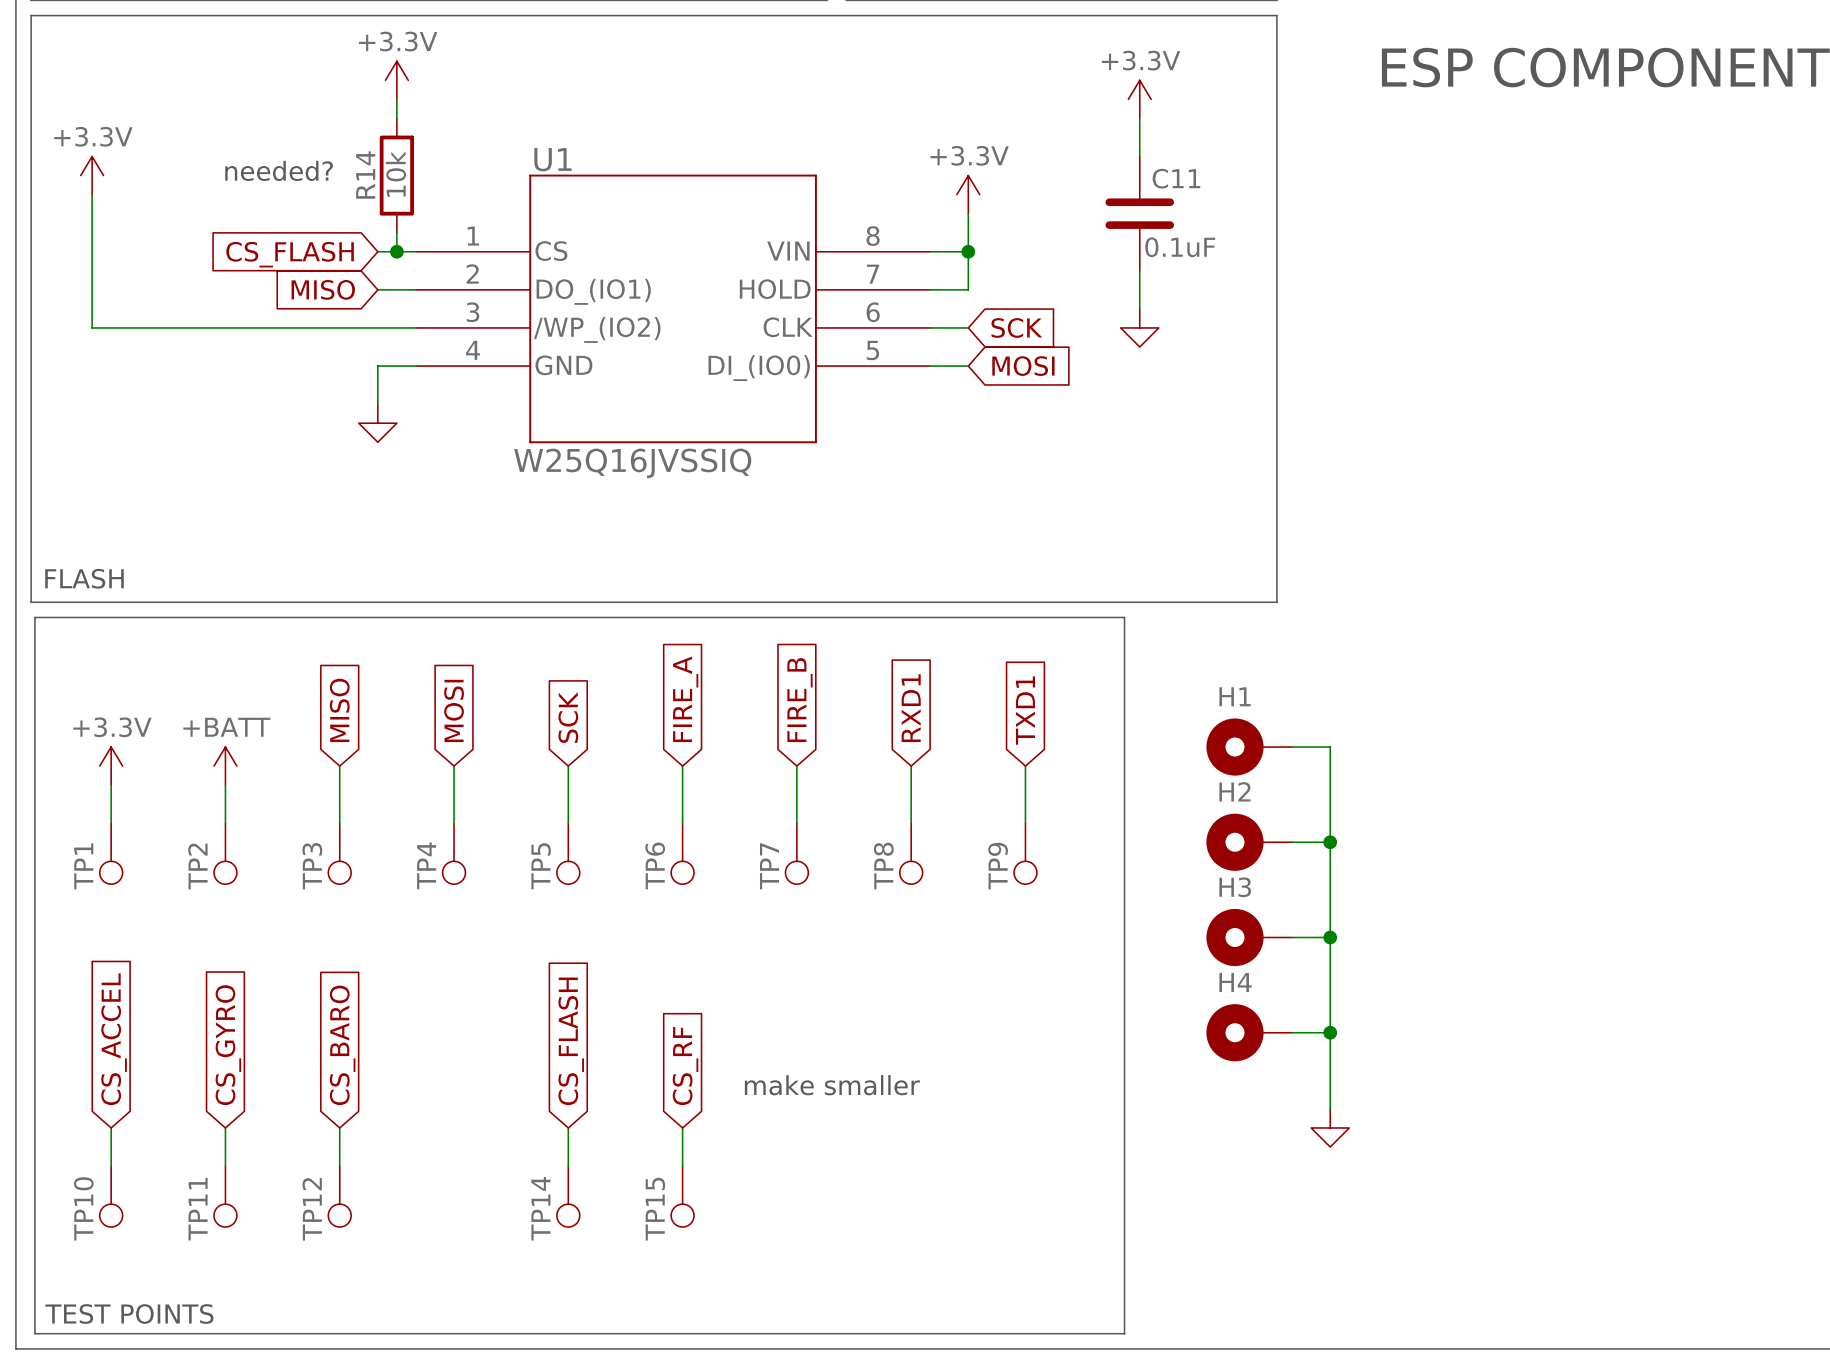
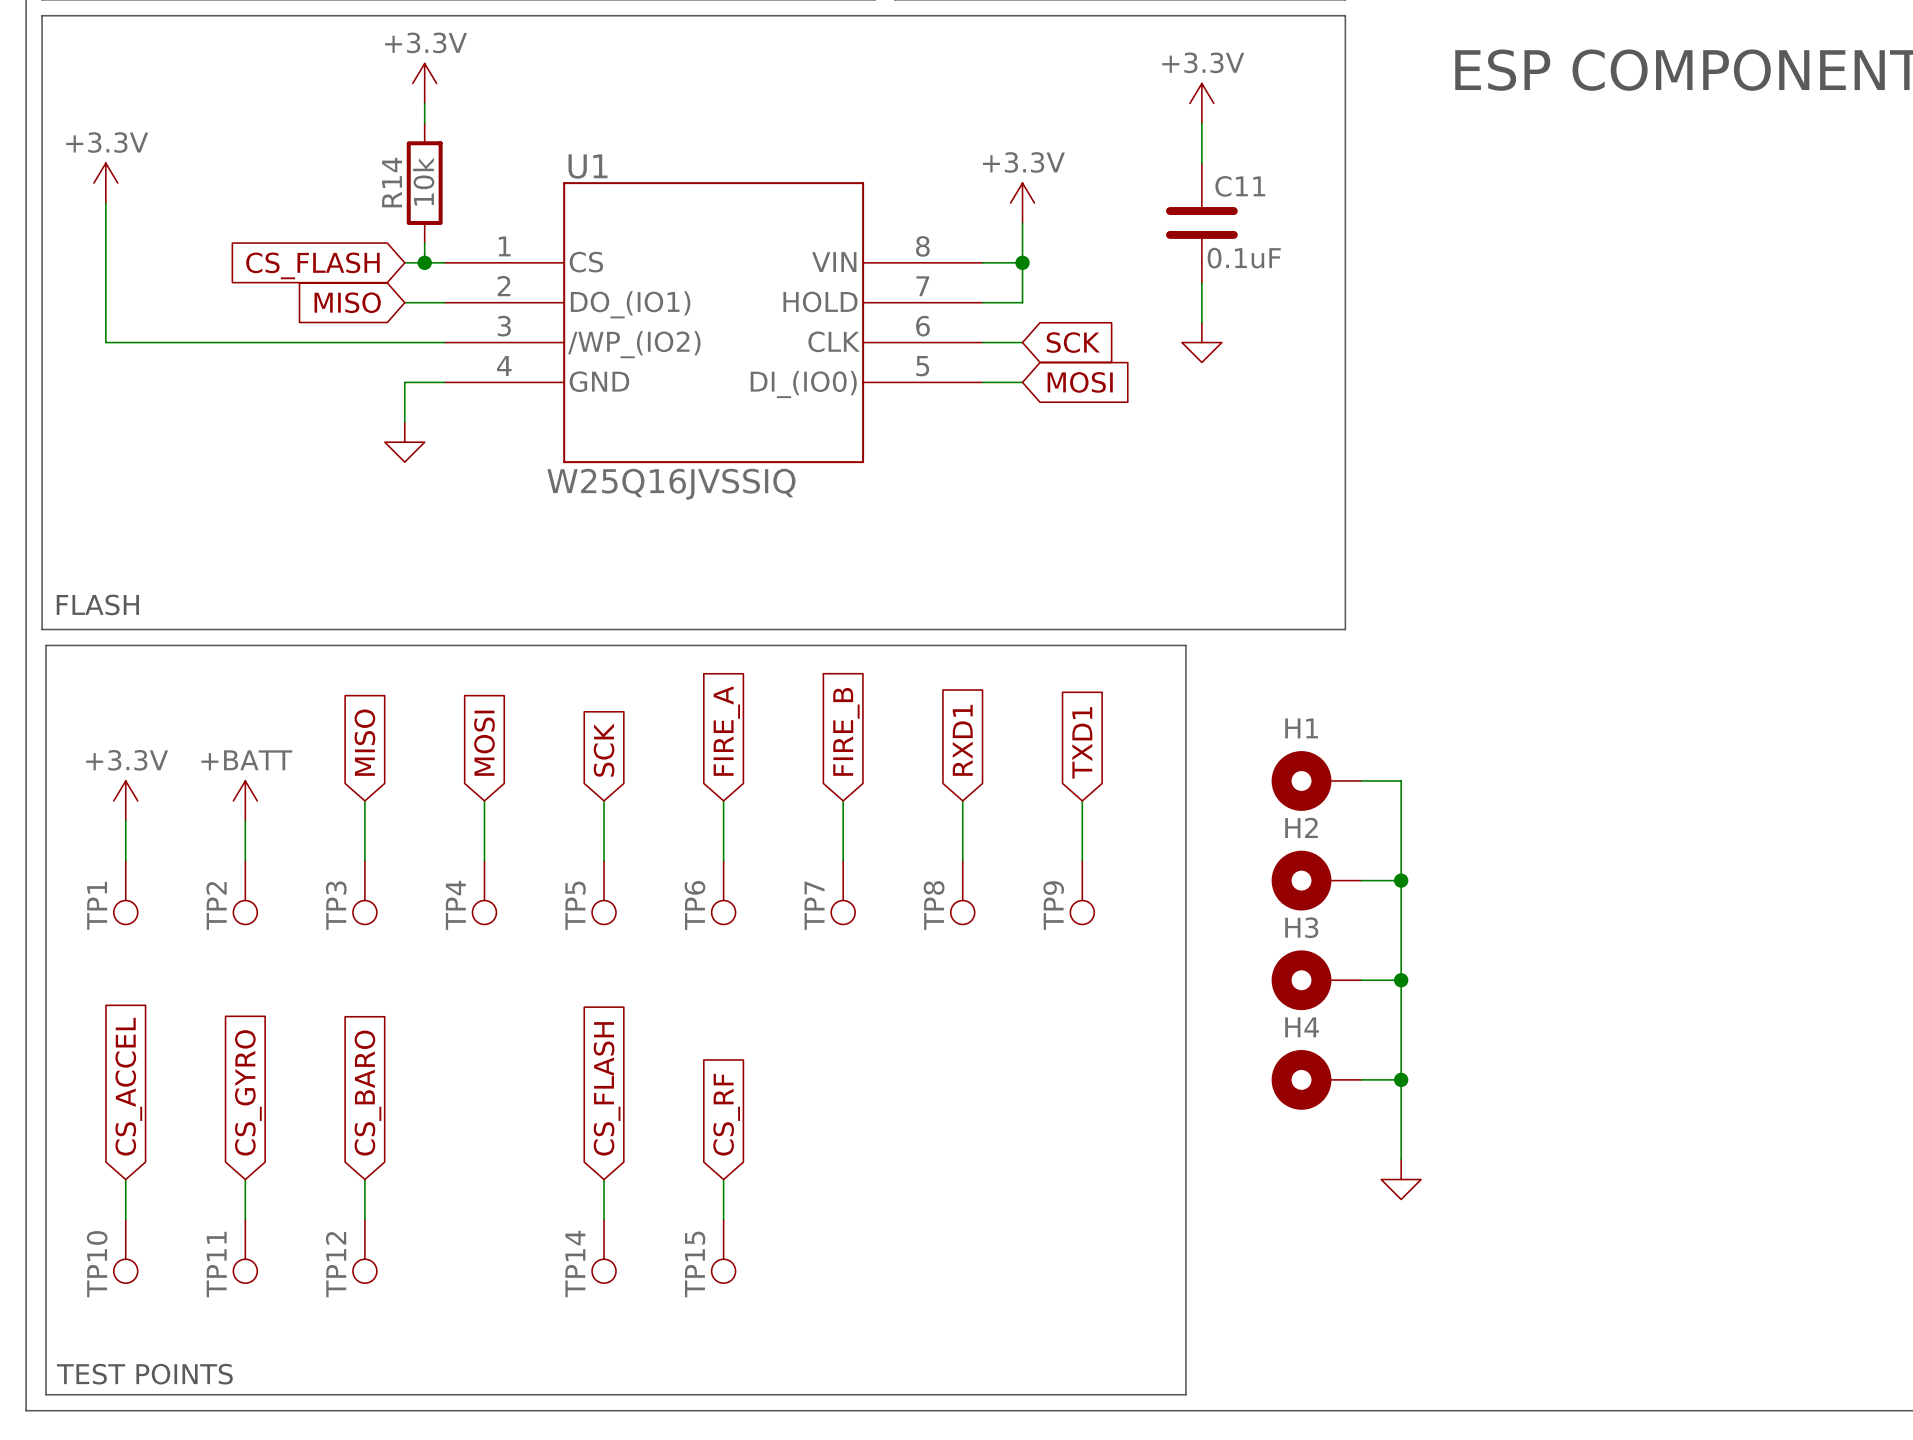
text: needed? (279, 170) -> none
text: make smaller (832, 1085) -> none

